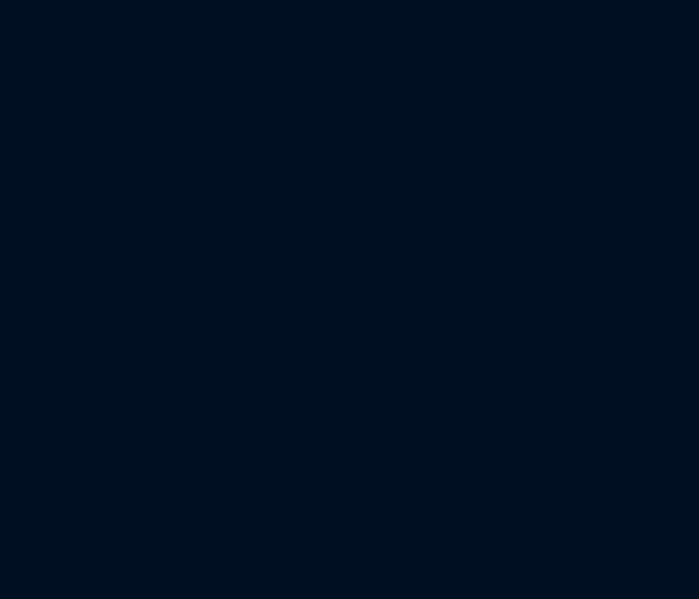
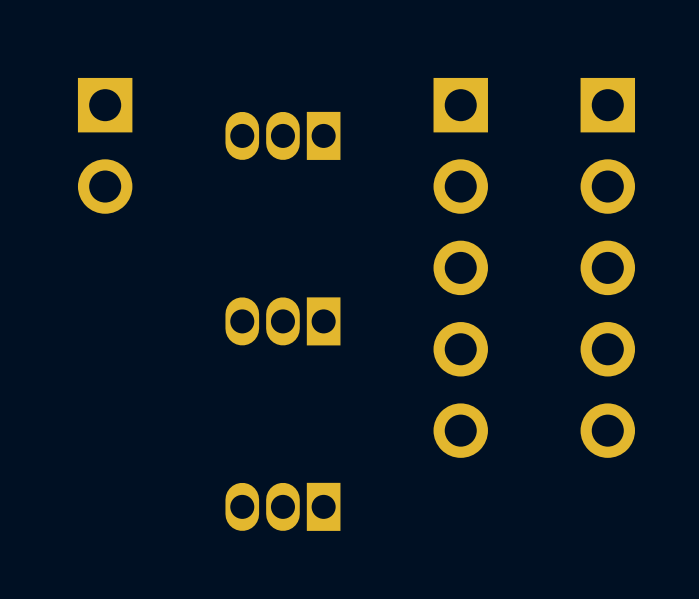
part: none -> (282, 135)
part: none -> (105, 145)
part: none -> (460, 267)
part: none -> (607, 267)
part: none -> (282, 321)
part: none -> (282, 506)

